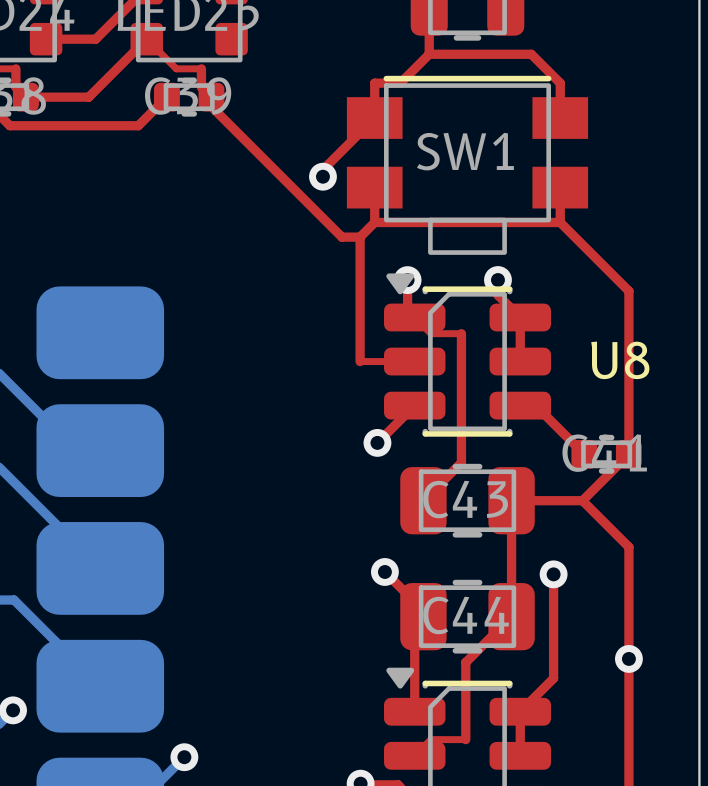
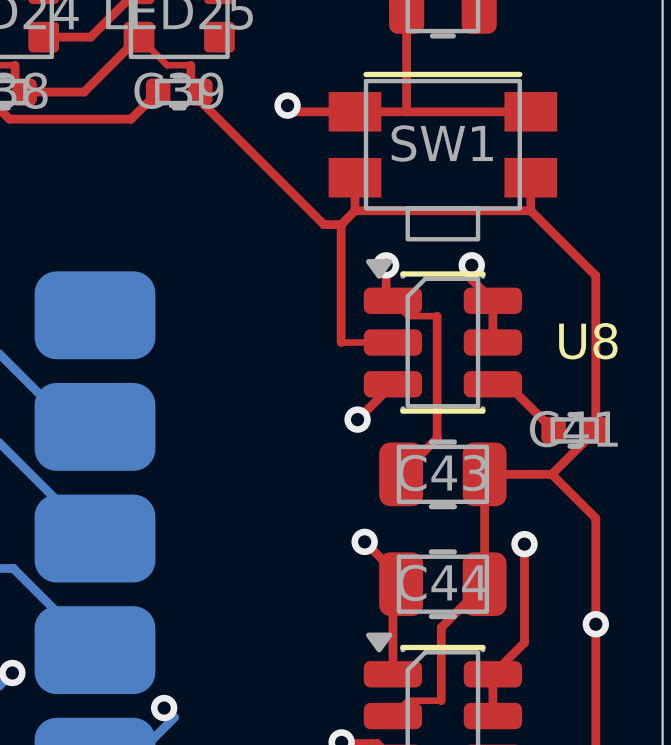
top track: none -> (406, 51) (406, 111)
top track: (560, 118) (560, 83) (531, 54) (429, 54) (400, 83) (374, 83) (374, 118) (322, 169) (322, 176) -> (530, 111) (293, 111) (287, 105)
via position: (322, 176) -> (287, 105)
via position: (184, 757) -> (164, 708)

